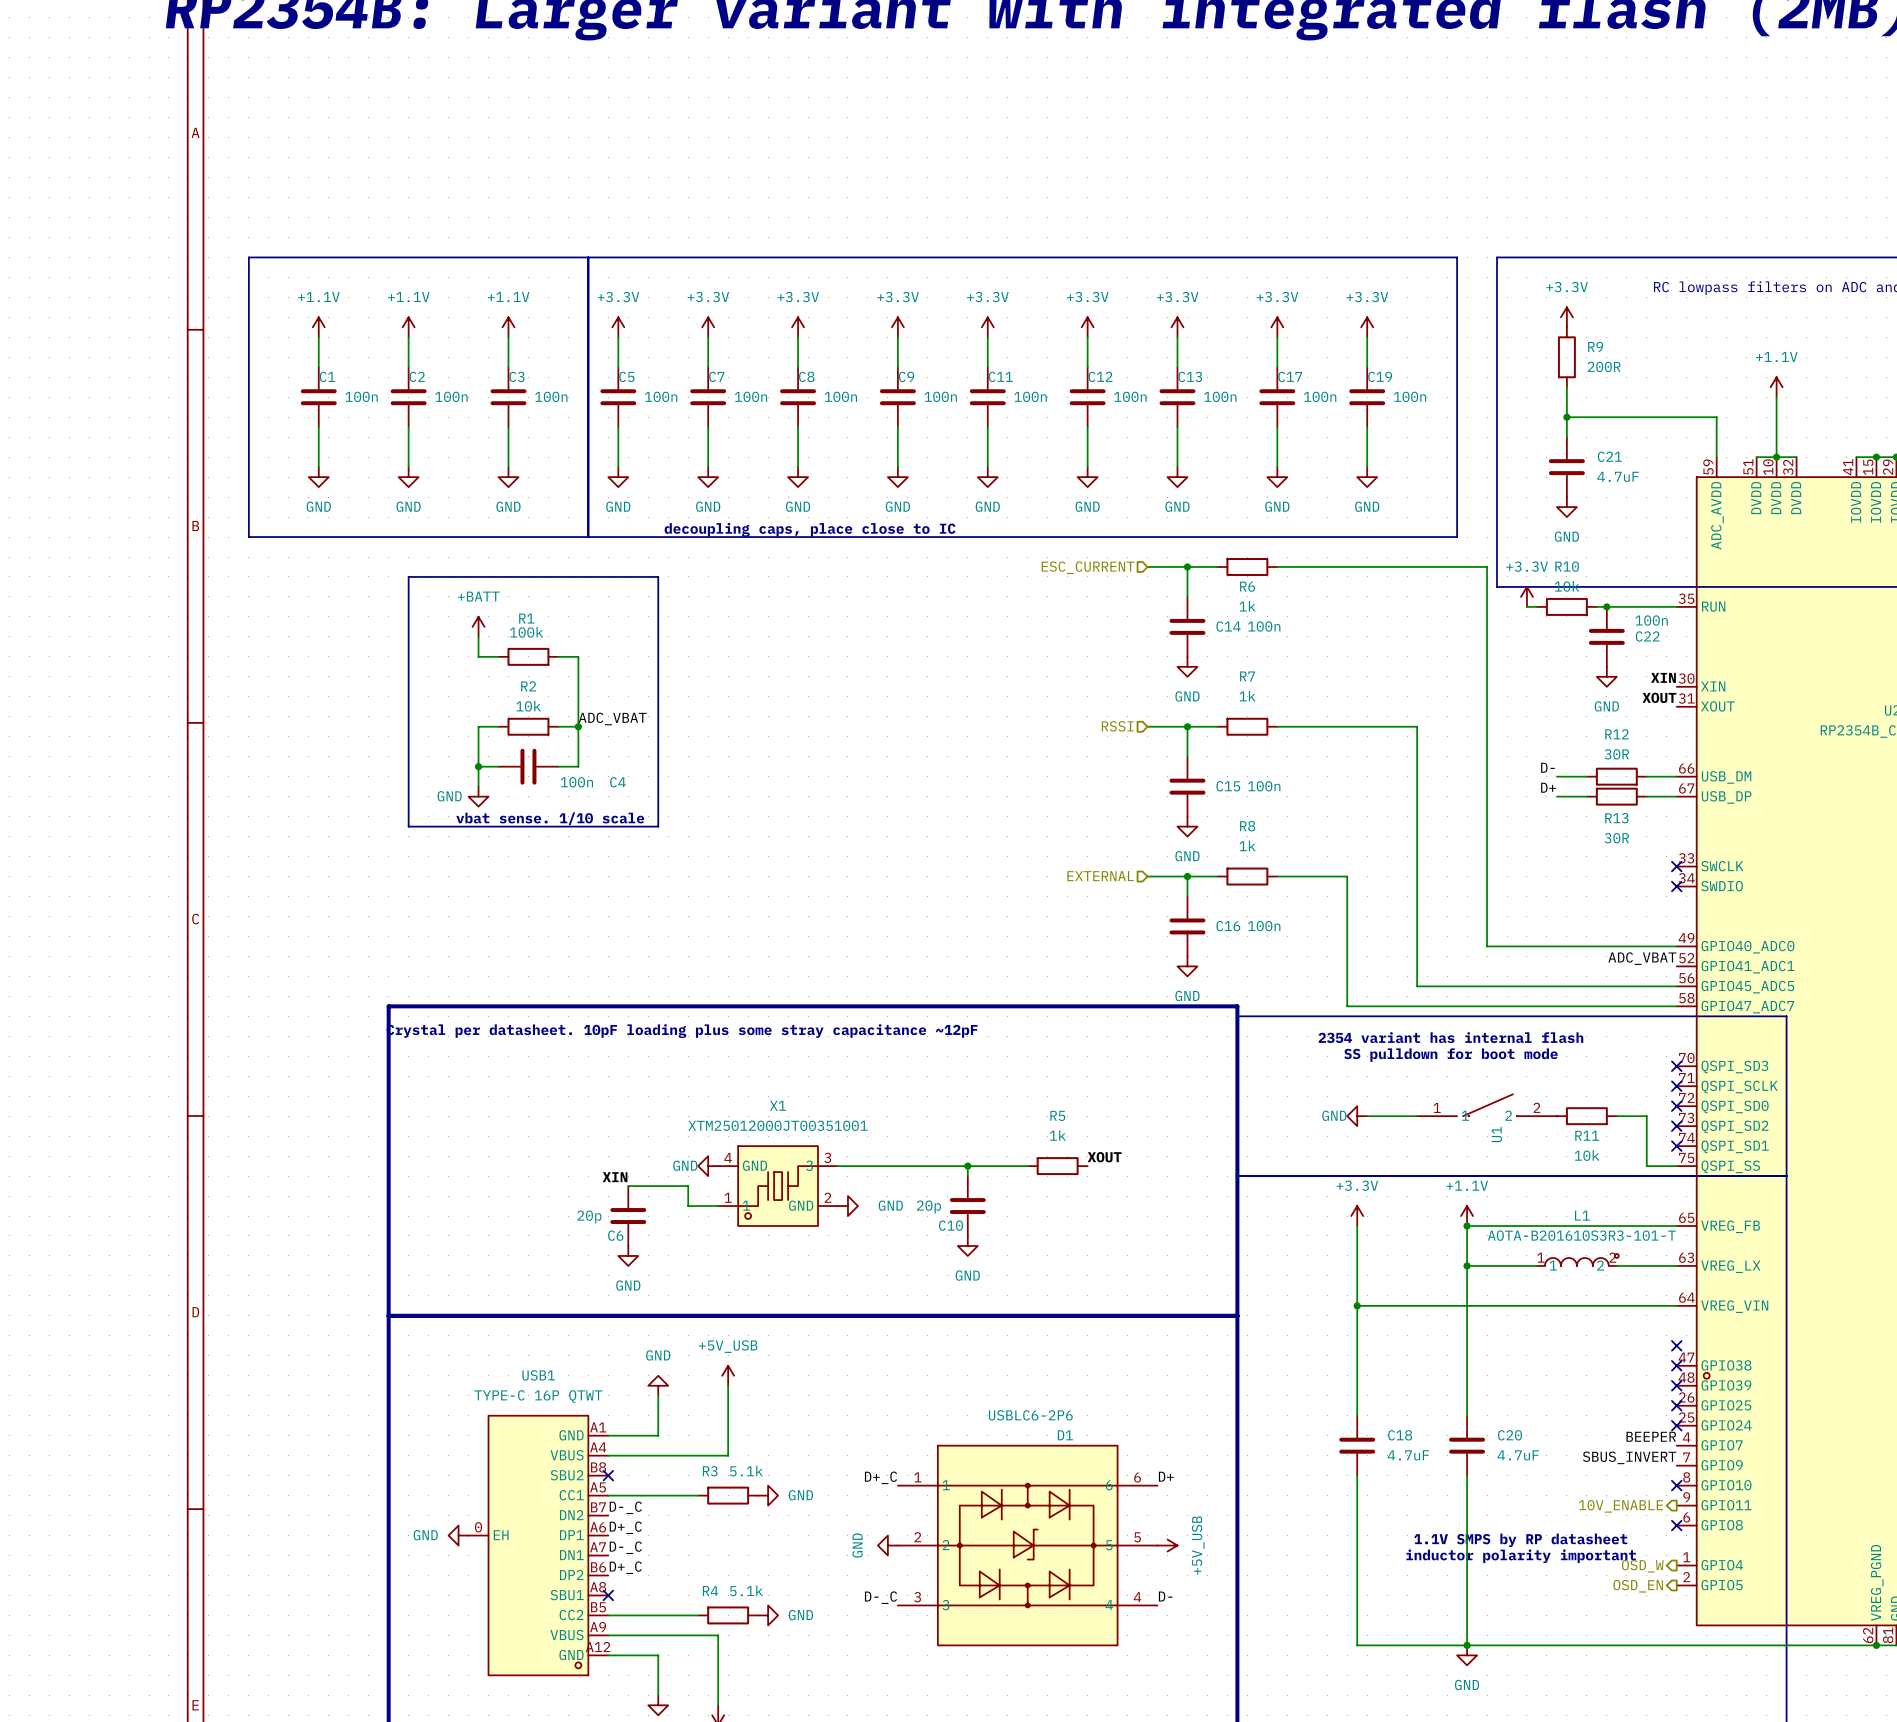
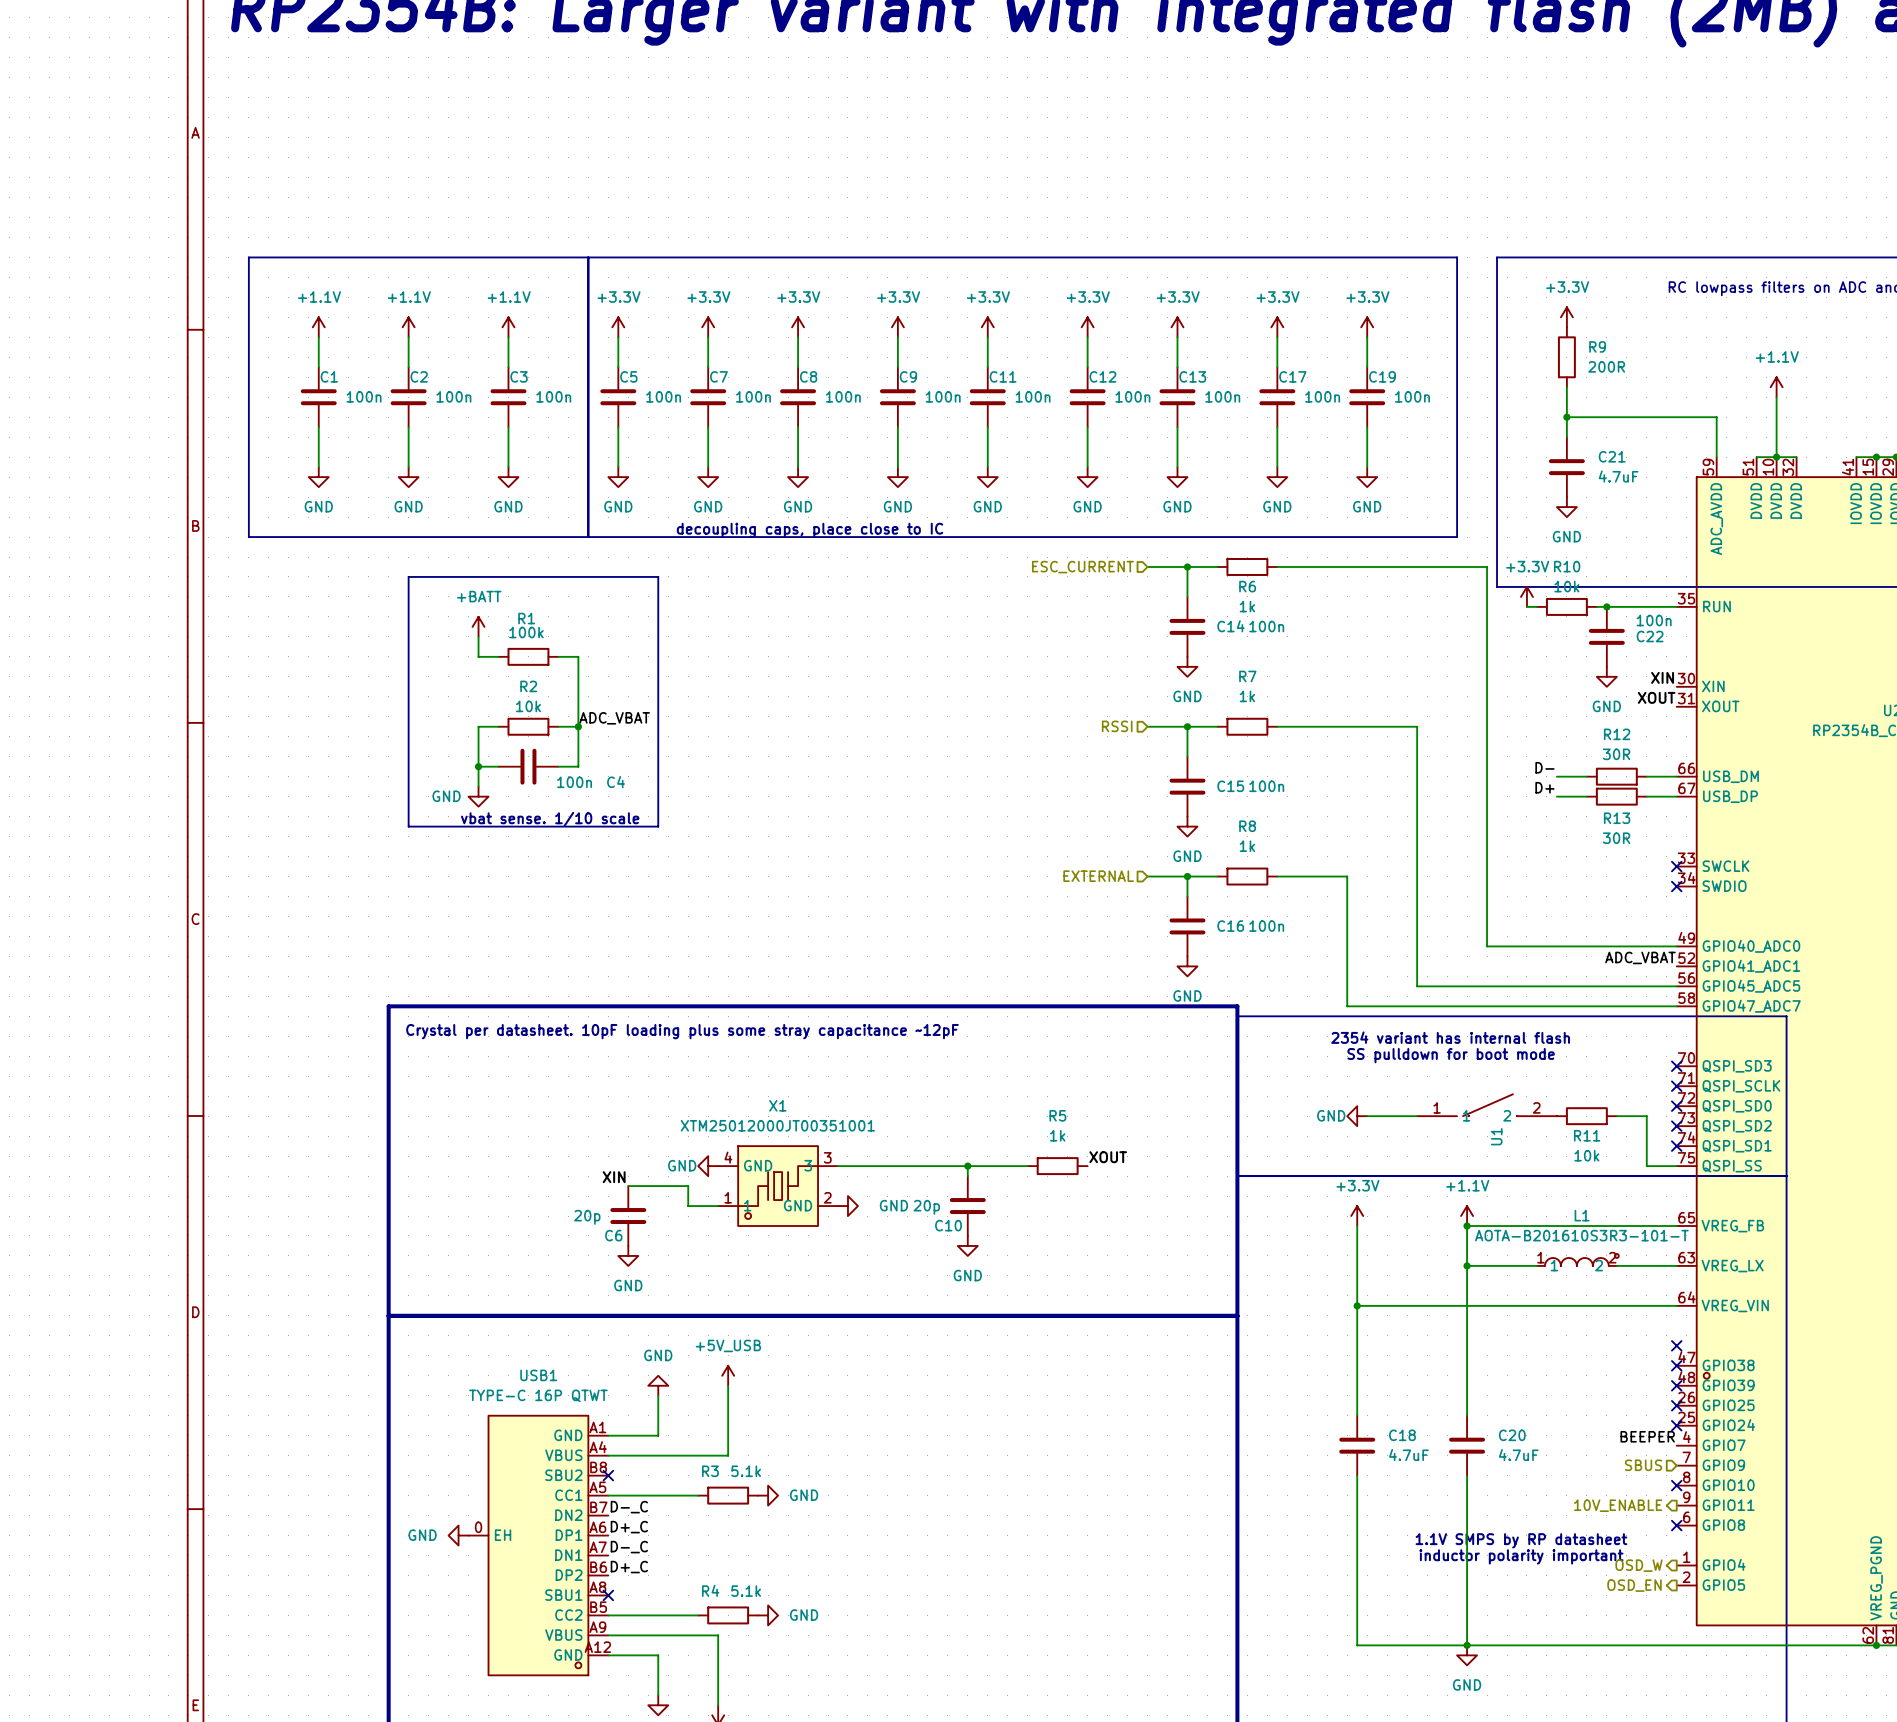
label: SBUS_INVERT (1629, 1457) -> none
hierarchical label: none -> SBUS (1643, 1465)
label: D+ (1166, 1476) -> none
label: D+_C (880, 1477) -> none
power symbol: GND (887, 1545) -> none
D1: USBLC6-2P6 (1027, 1545) -> none
power symbol: +5V_USB (1167, 1545) -> none
label: D- (1165, 1596) -> none
label: D-_C (880, 1597) -> none

